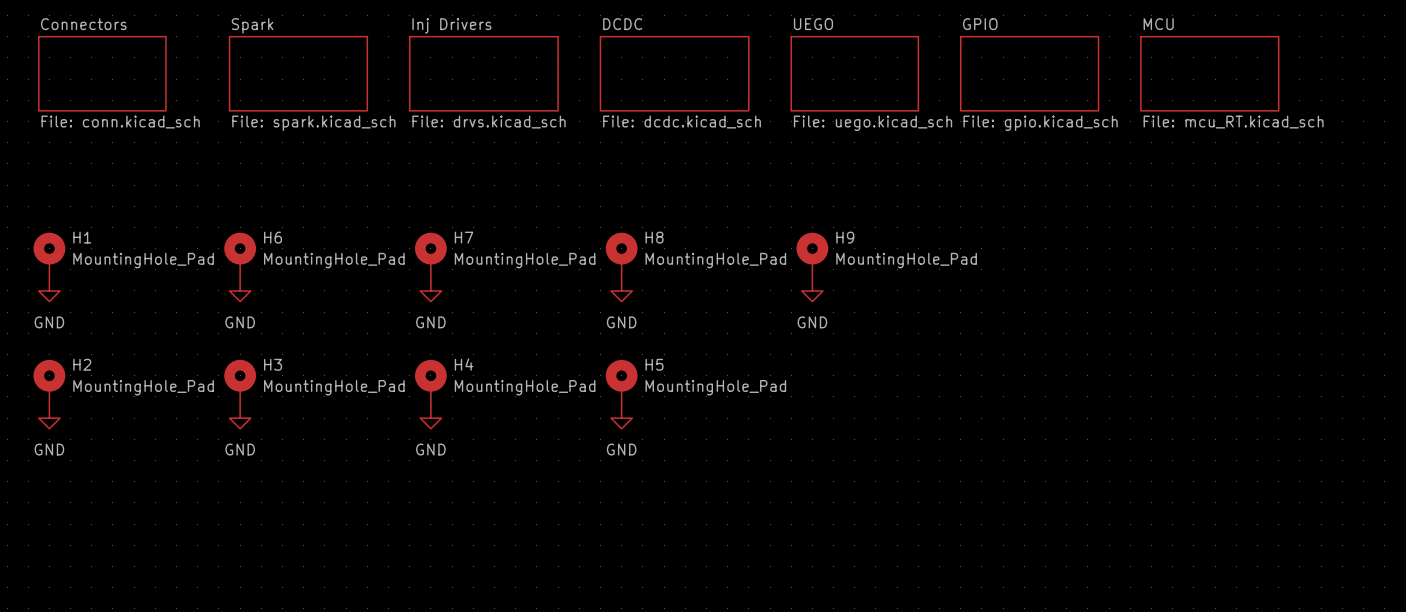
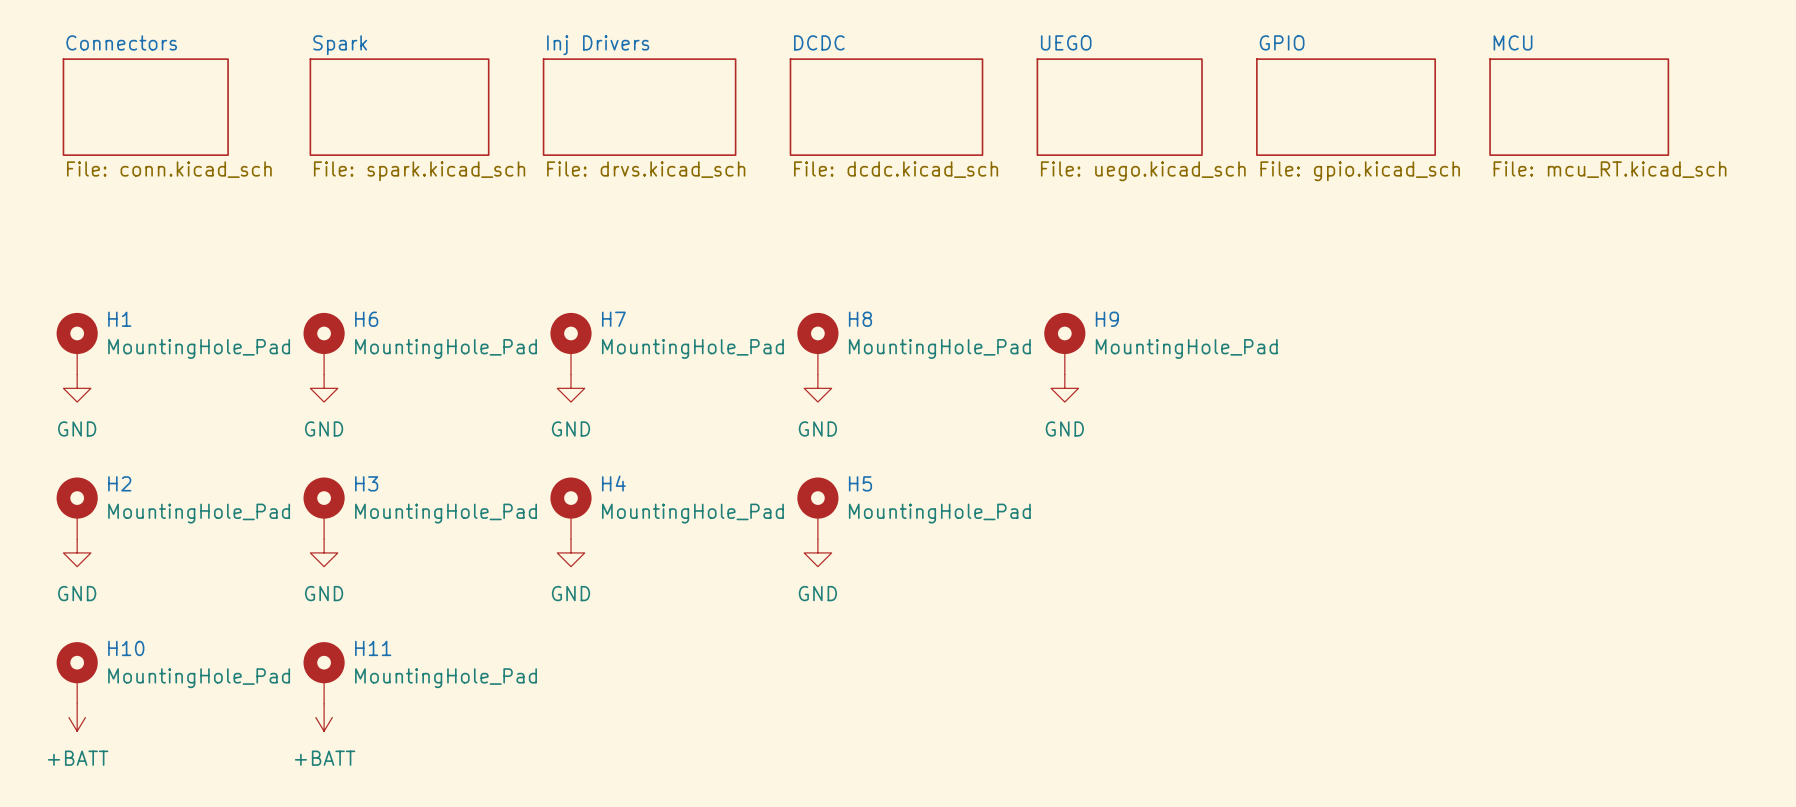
H10: none -> MountingHole_Pad (77, 672)
H11: none -> MountingHole_Pad (324, 672)
power symbol: none -> +BATT (77, 717)
power symbol: none -> +BATT (324, 717)

